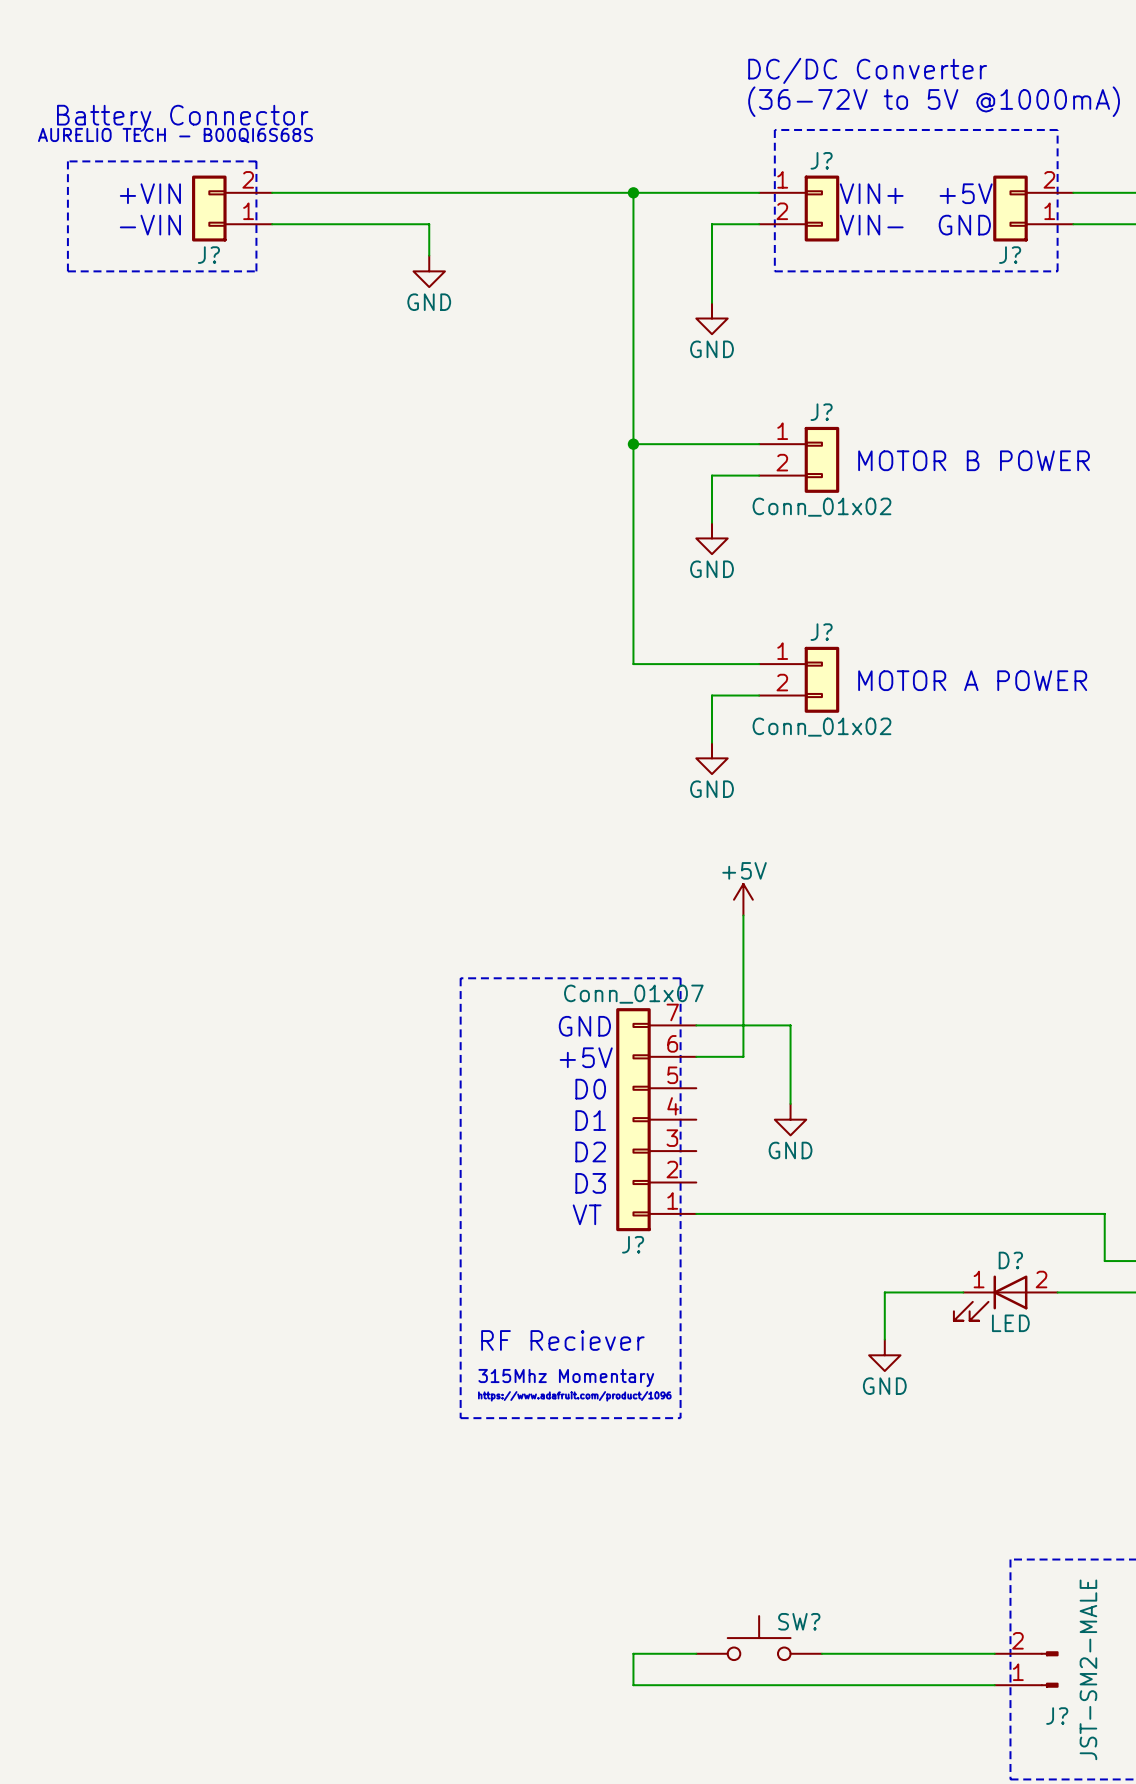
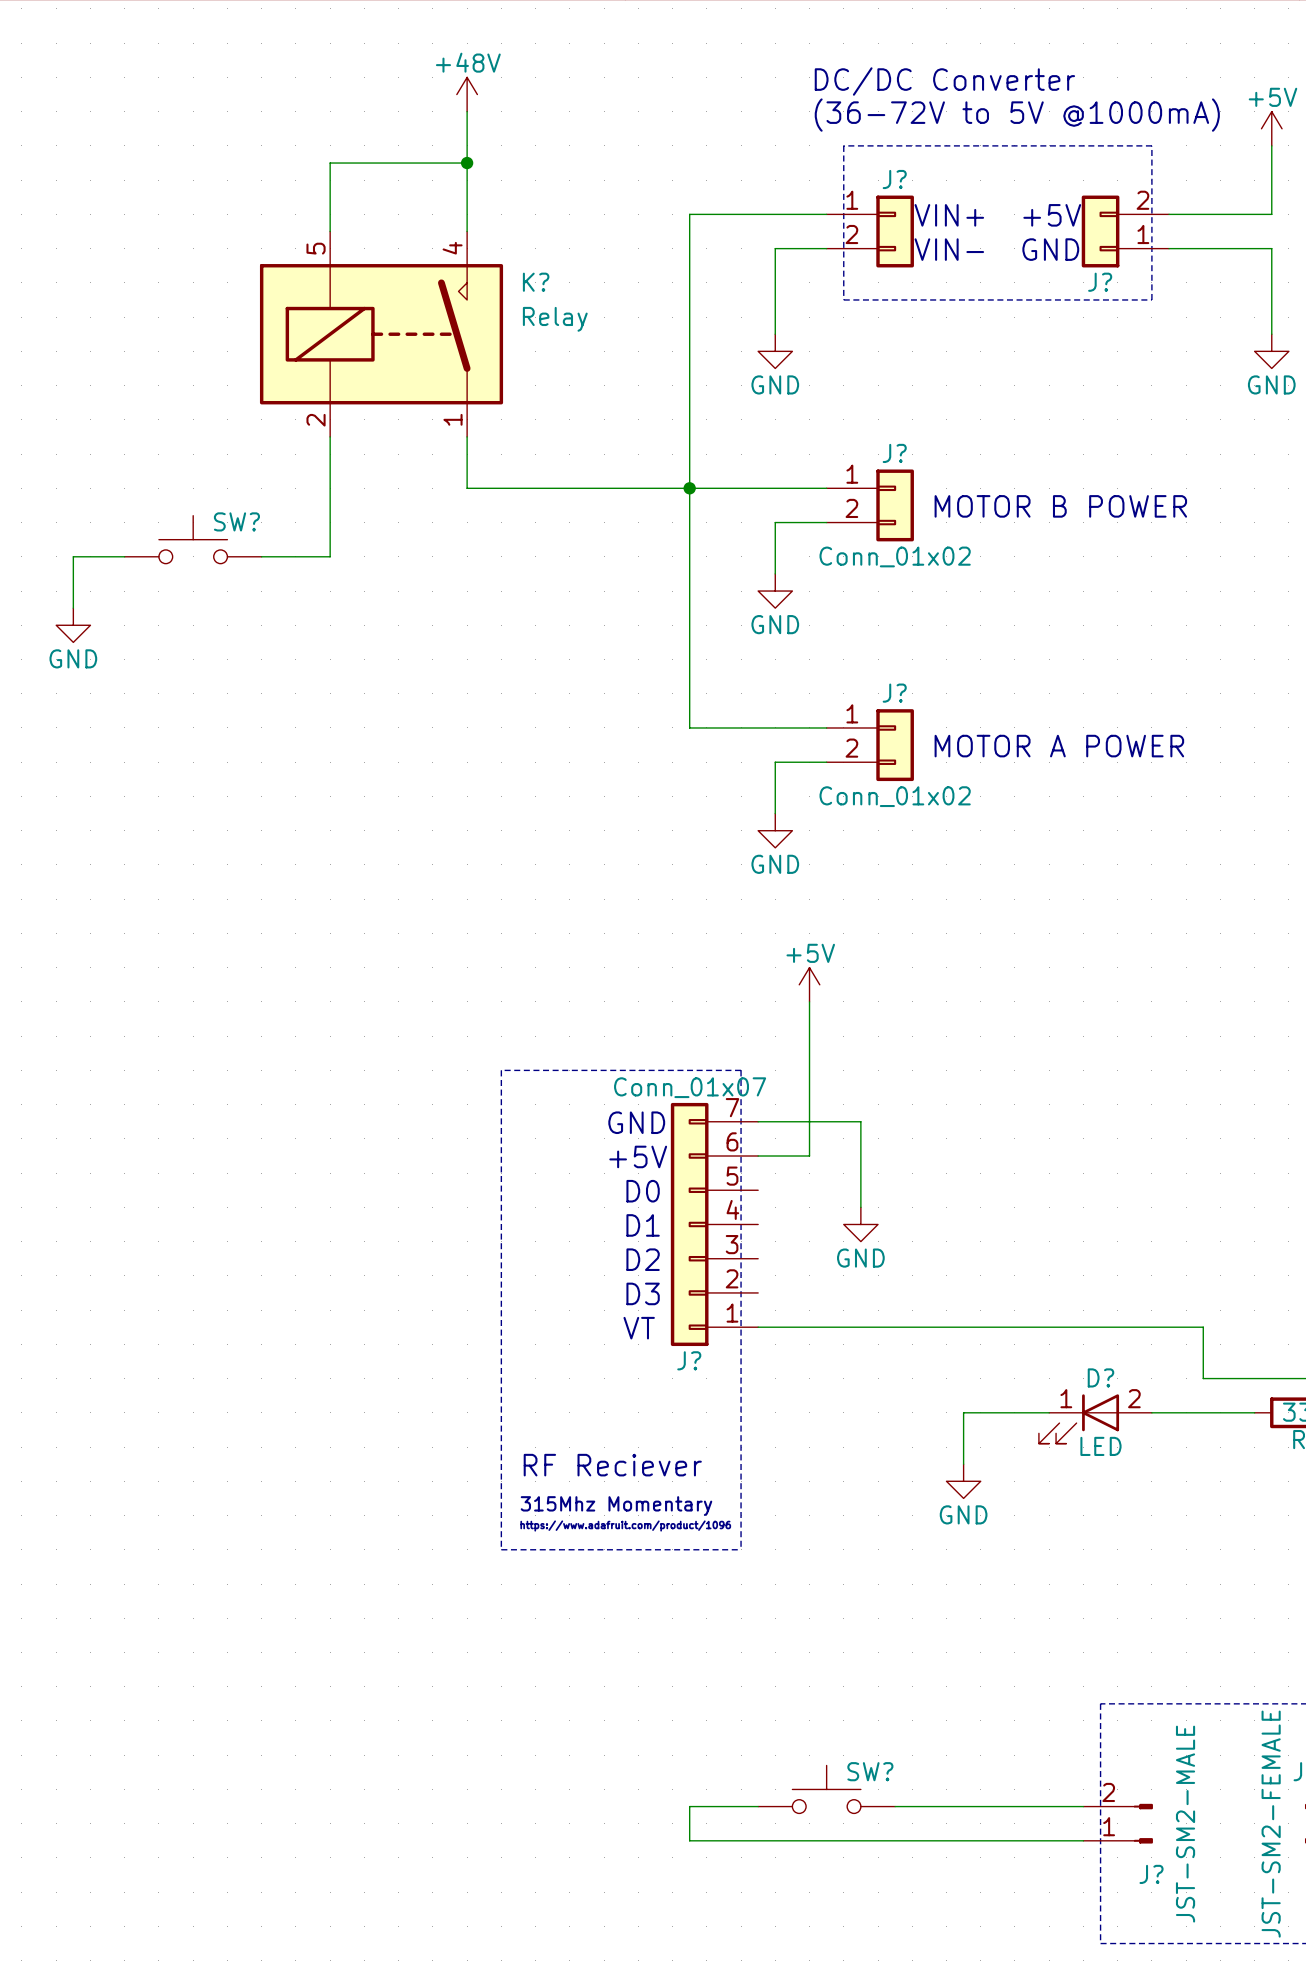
power symbol: none -> +48V (467, 94)
wire: none -> (467, 111) (467, 231)
text: Battery Connector (182, 118) -> none
text: AURELIO TECH - B00QI6S68S (175, 135) -> none
wire: none -> (467, 163) (330, 163) (330, 231)
junction: none -> (467, 163)
line: (67, 161) (256, 161) (256, 271) (67, 271) (67, 161) -> none
wire: (272, 192) (633, 192) -> none
junction: (633, 192) -> none
text: +VIN (150, 193) -> none
J?: (232, 208) -> none
wire: (272, 224) (429, 224) (429, 255) -> none
text: -VIN (150, 225) -> none
power symbol: GND (429, 271) -> none
K?: none -> Relay (381, 334)
wire: none -> (330, 436) (330, 556) (261, 556)
wire: none -> (467, 436) (467, 488) (689, 488)
SW?: none -> (193, 539)
wire: none -> (124, 556) (73, 556) (73, 608)
power symbol: none -> GND (73, 625)

